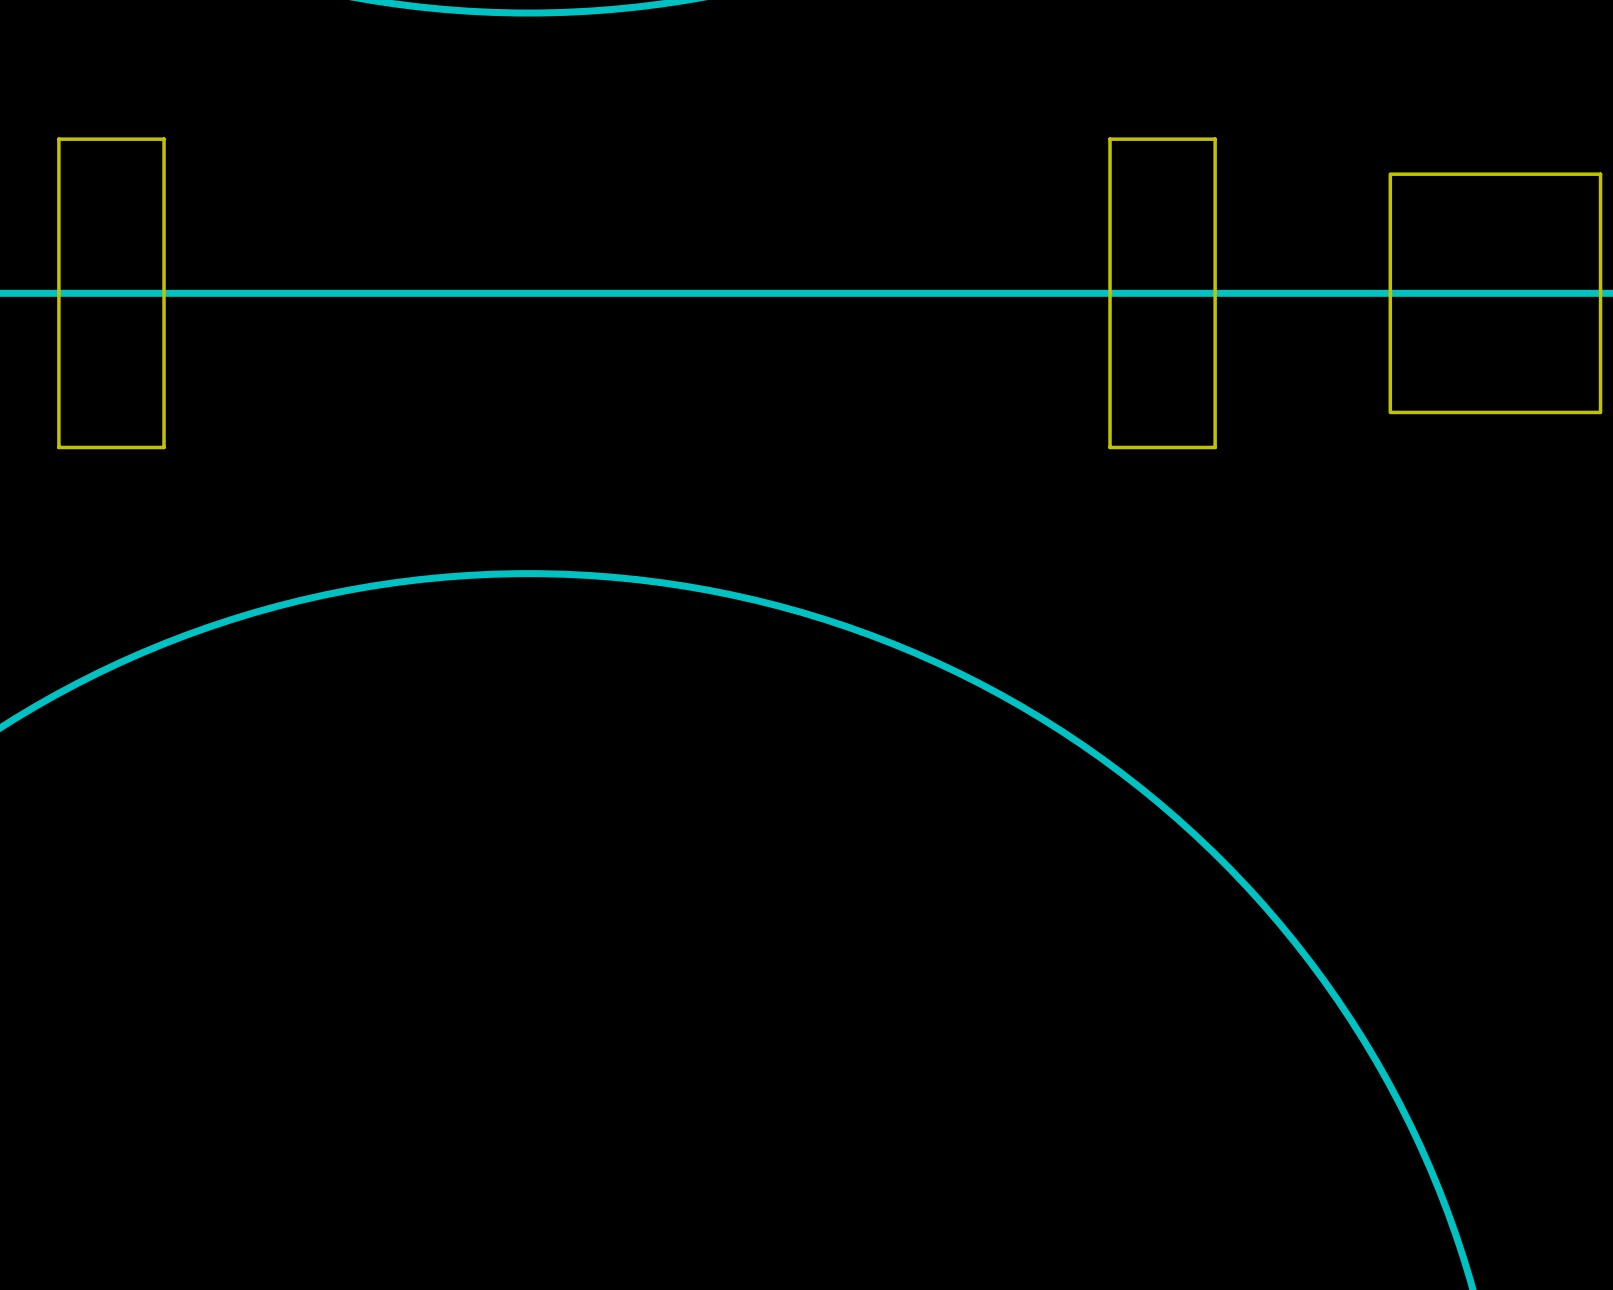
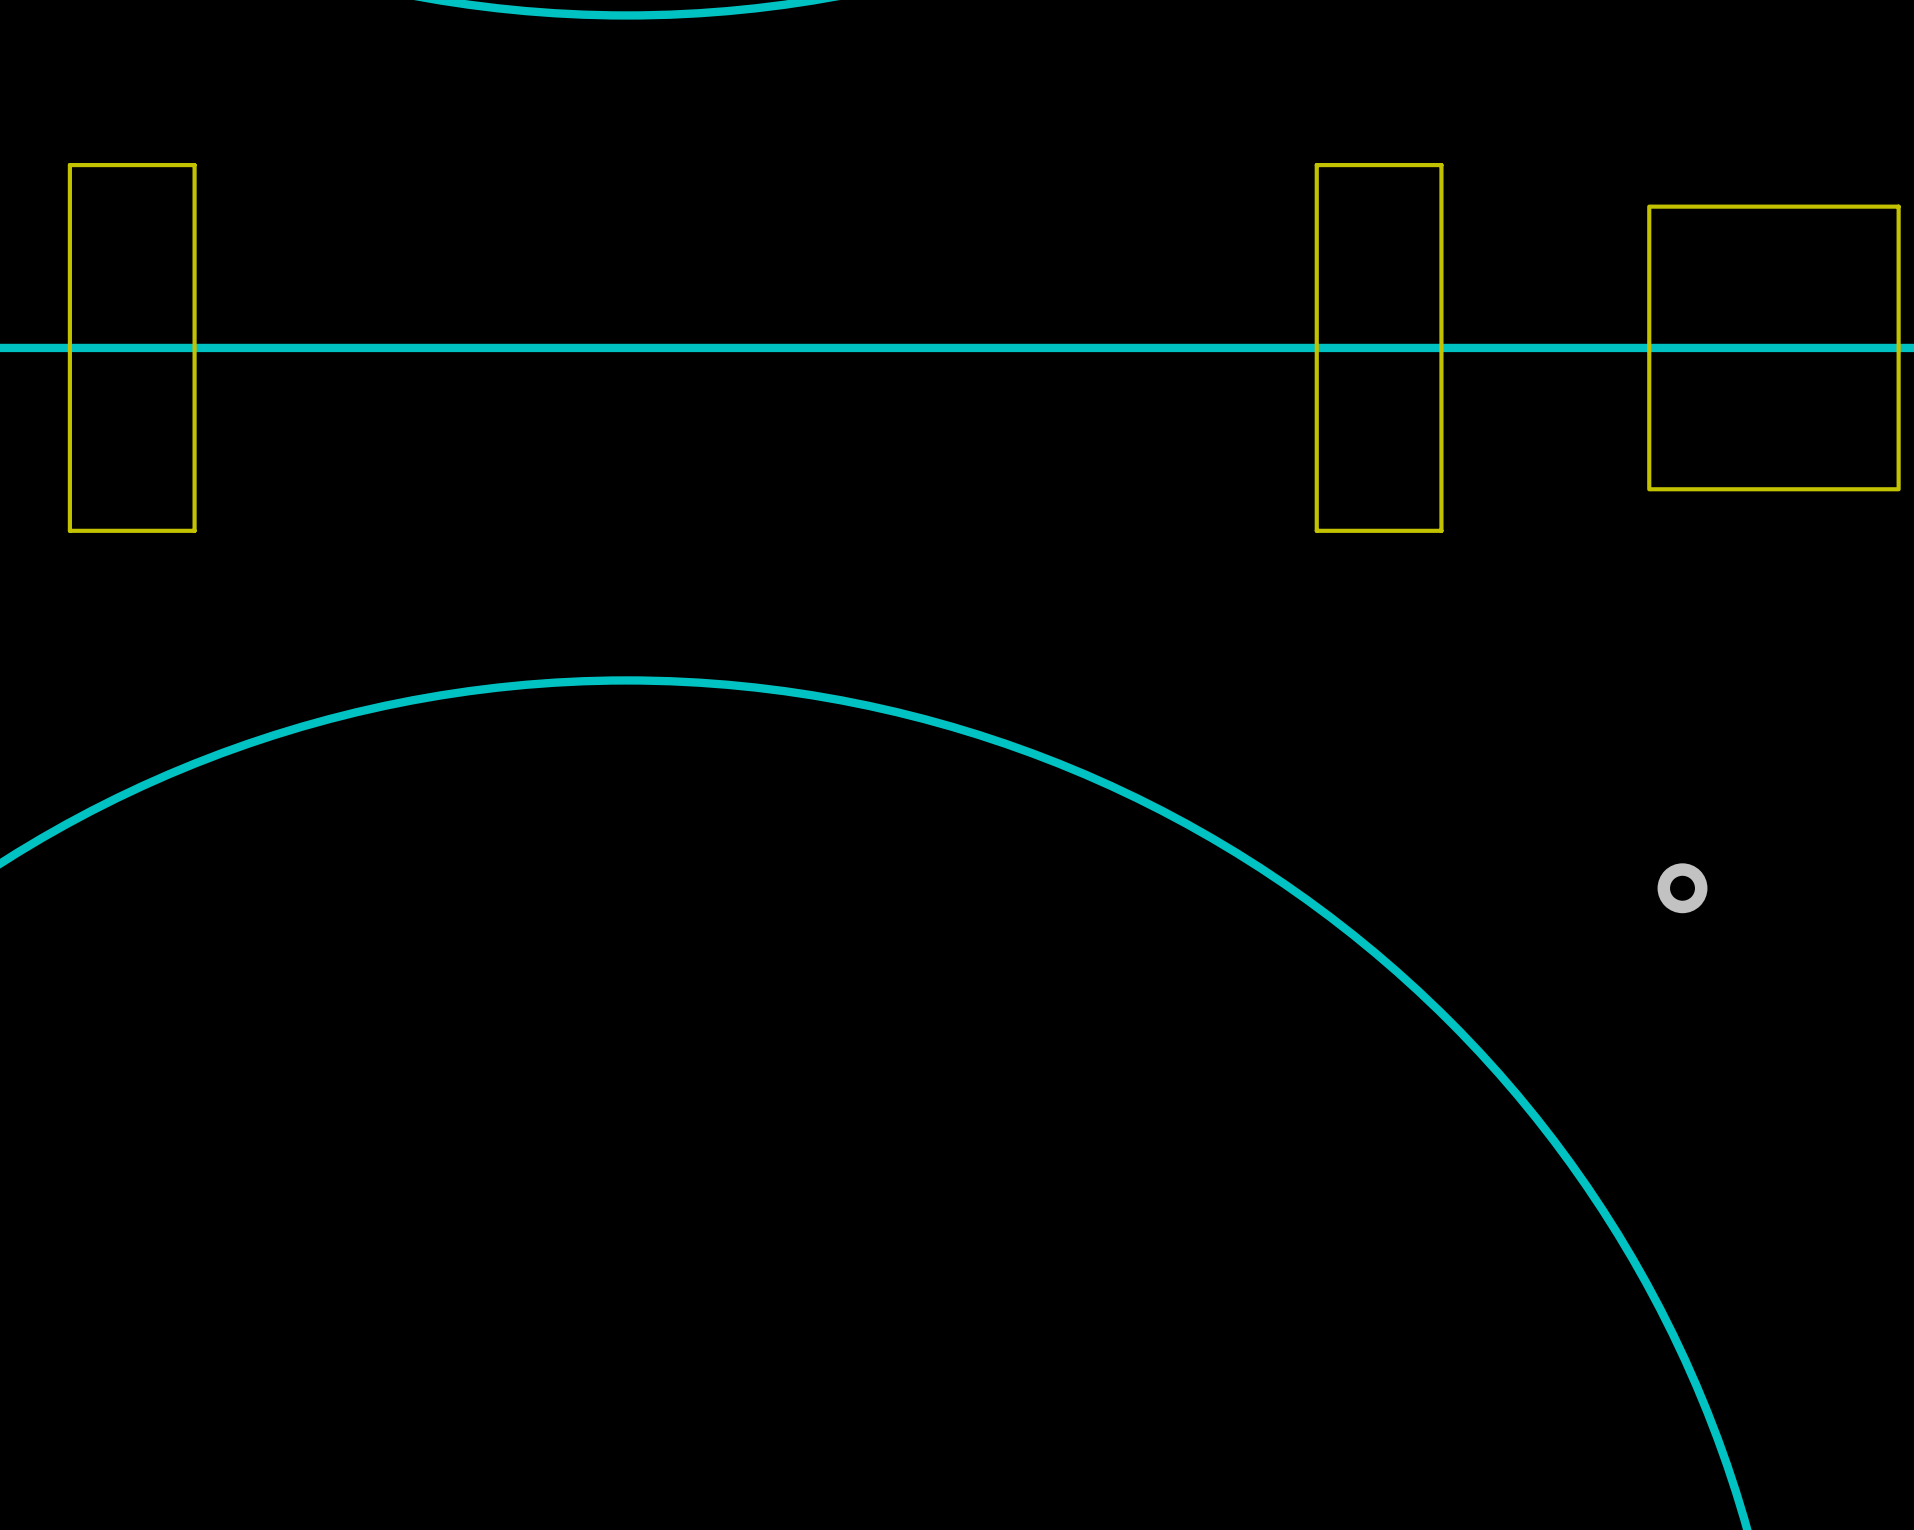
via: none -> (1682, 888)

